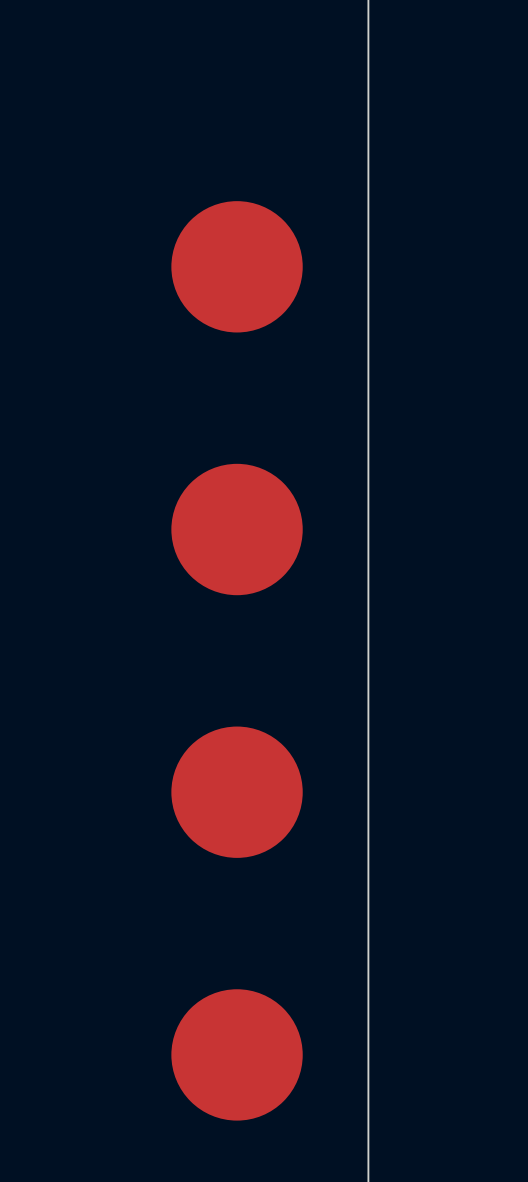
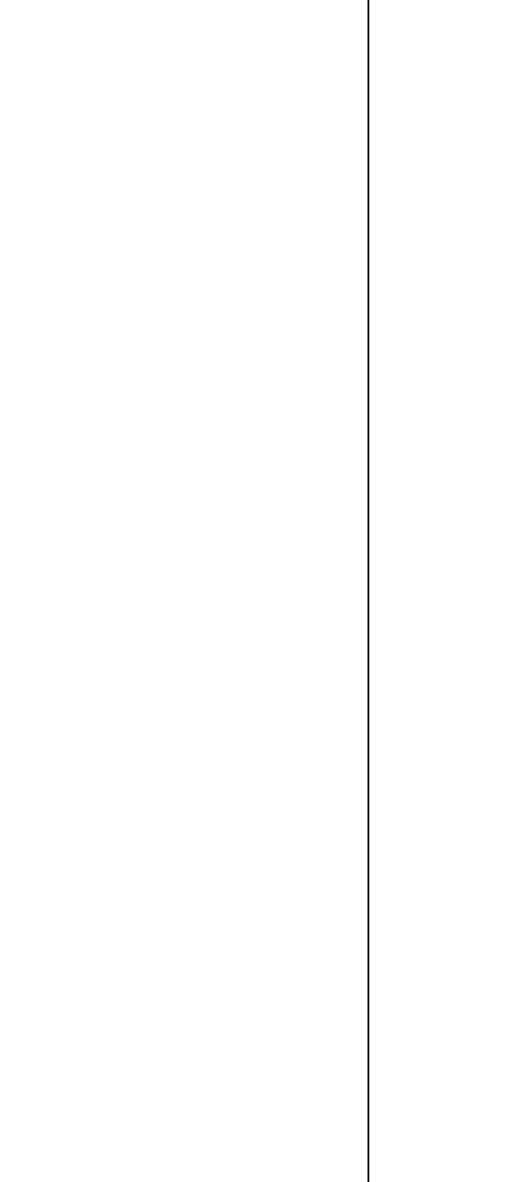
part: (237, 266) -> none
part: (237, 529) -> none
part: (237, 792) -> none
part: (237, 1054) -> none

